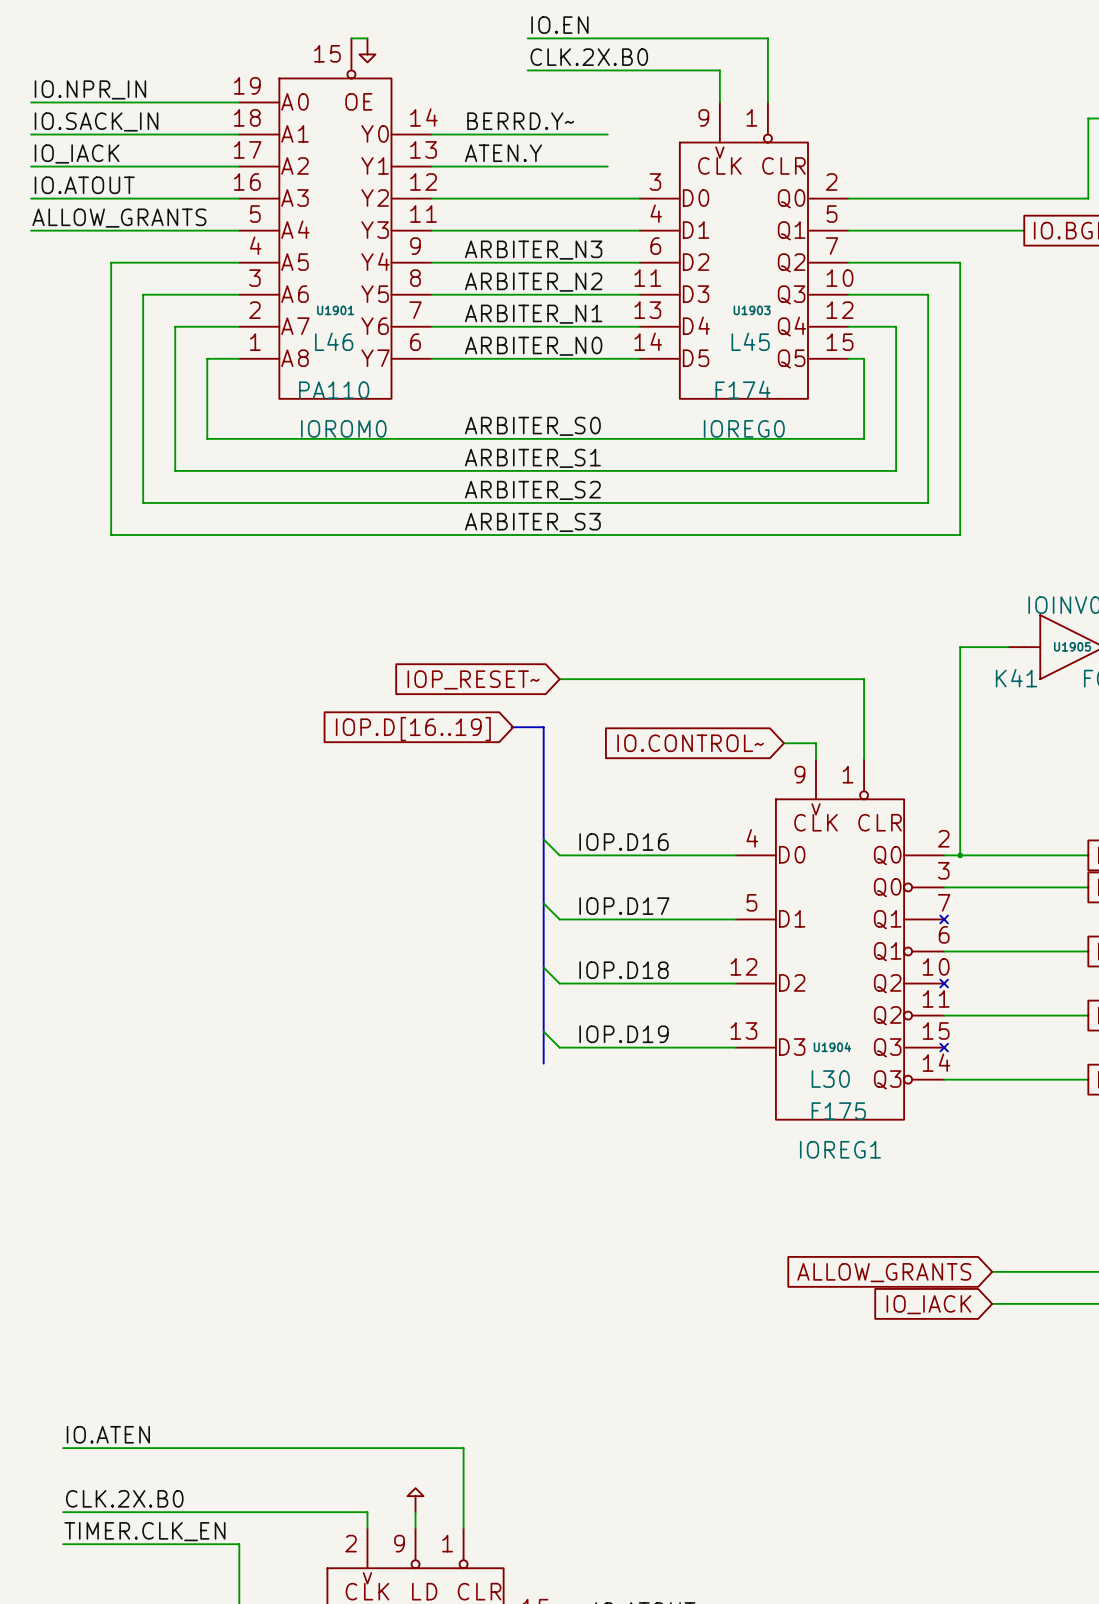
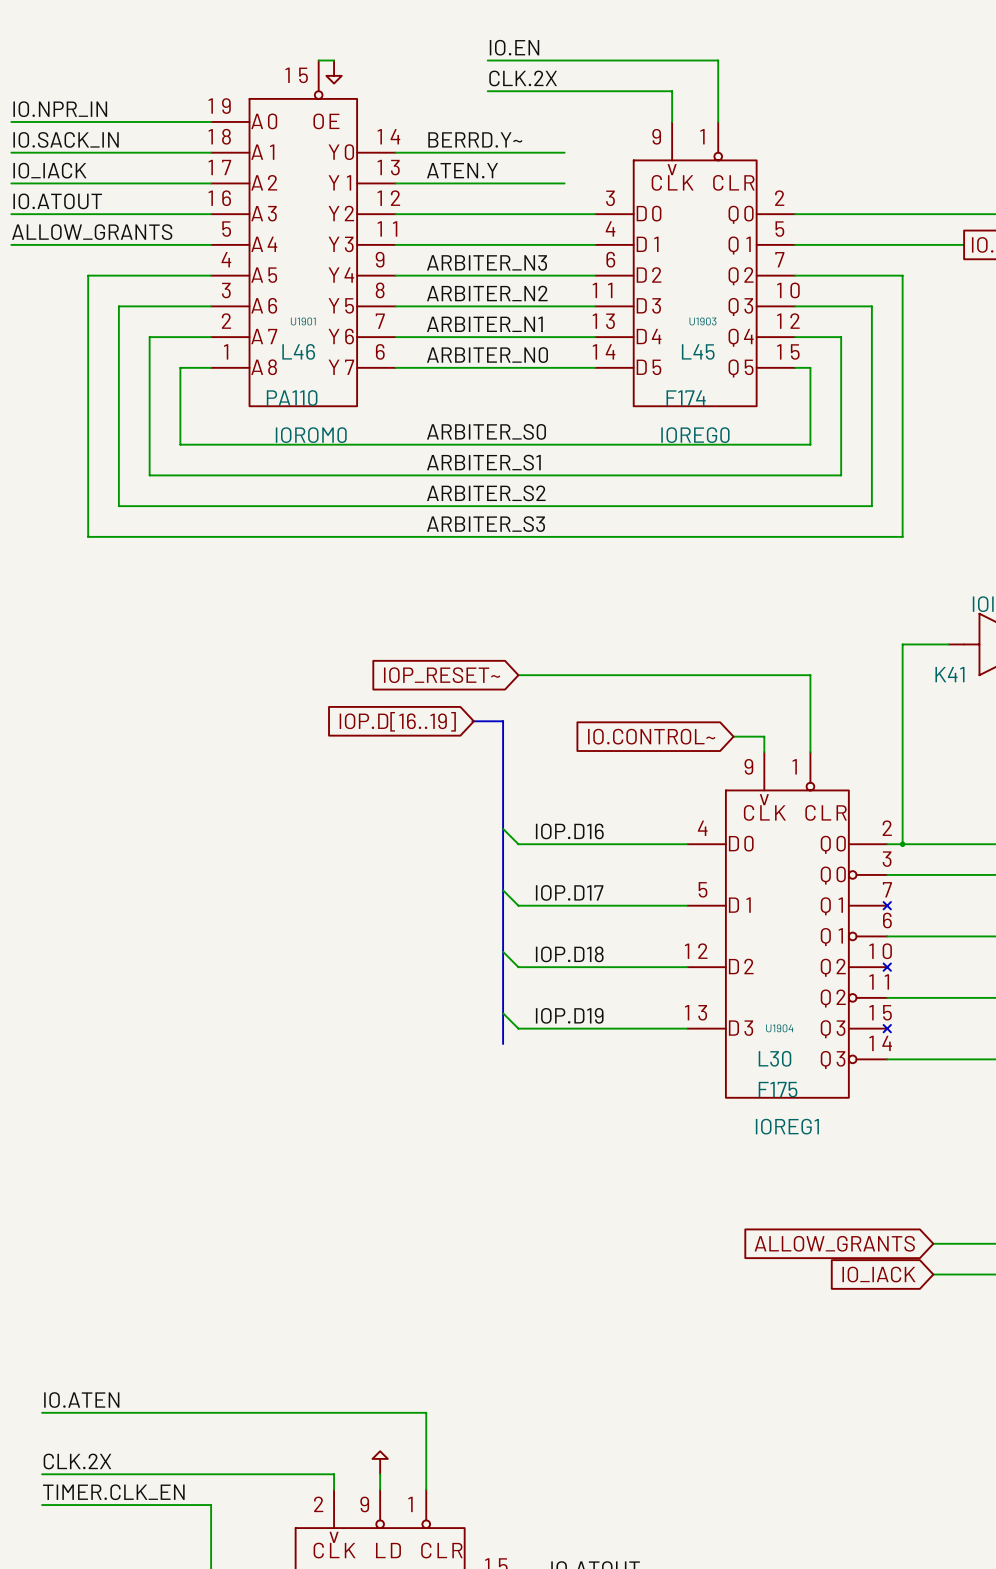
label: CLK.2X.B0 (589, 57) -> CLK.2X (523, 78)
label: CLK.2X.B0 (124, 1498) -> CLK.2X (77, 1461)

